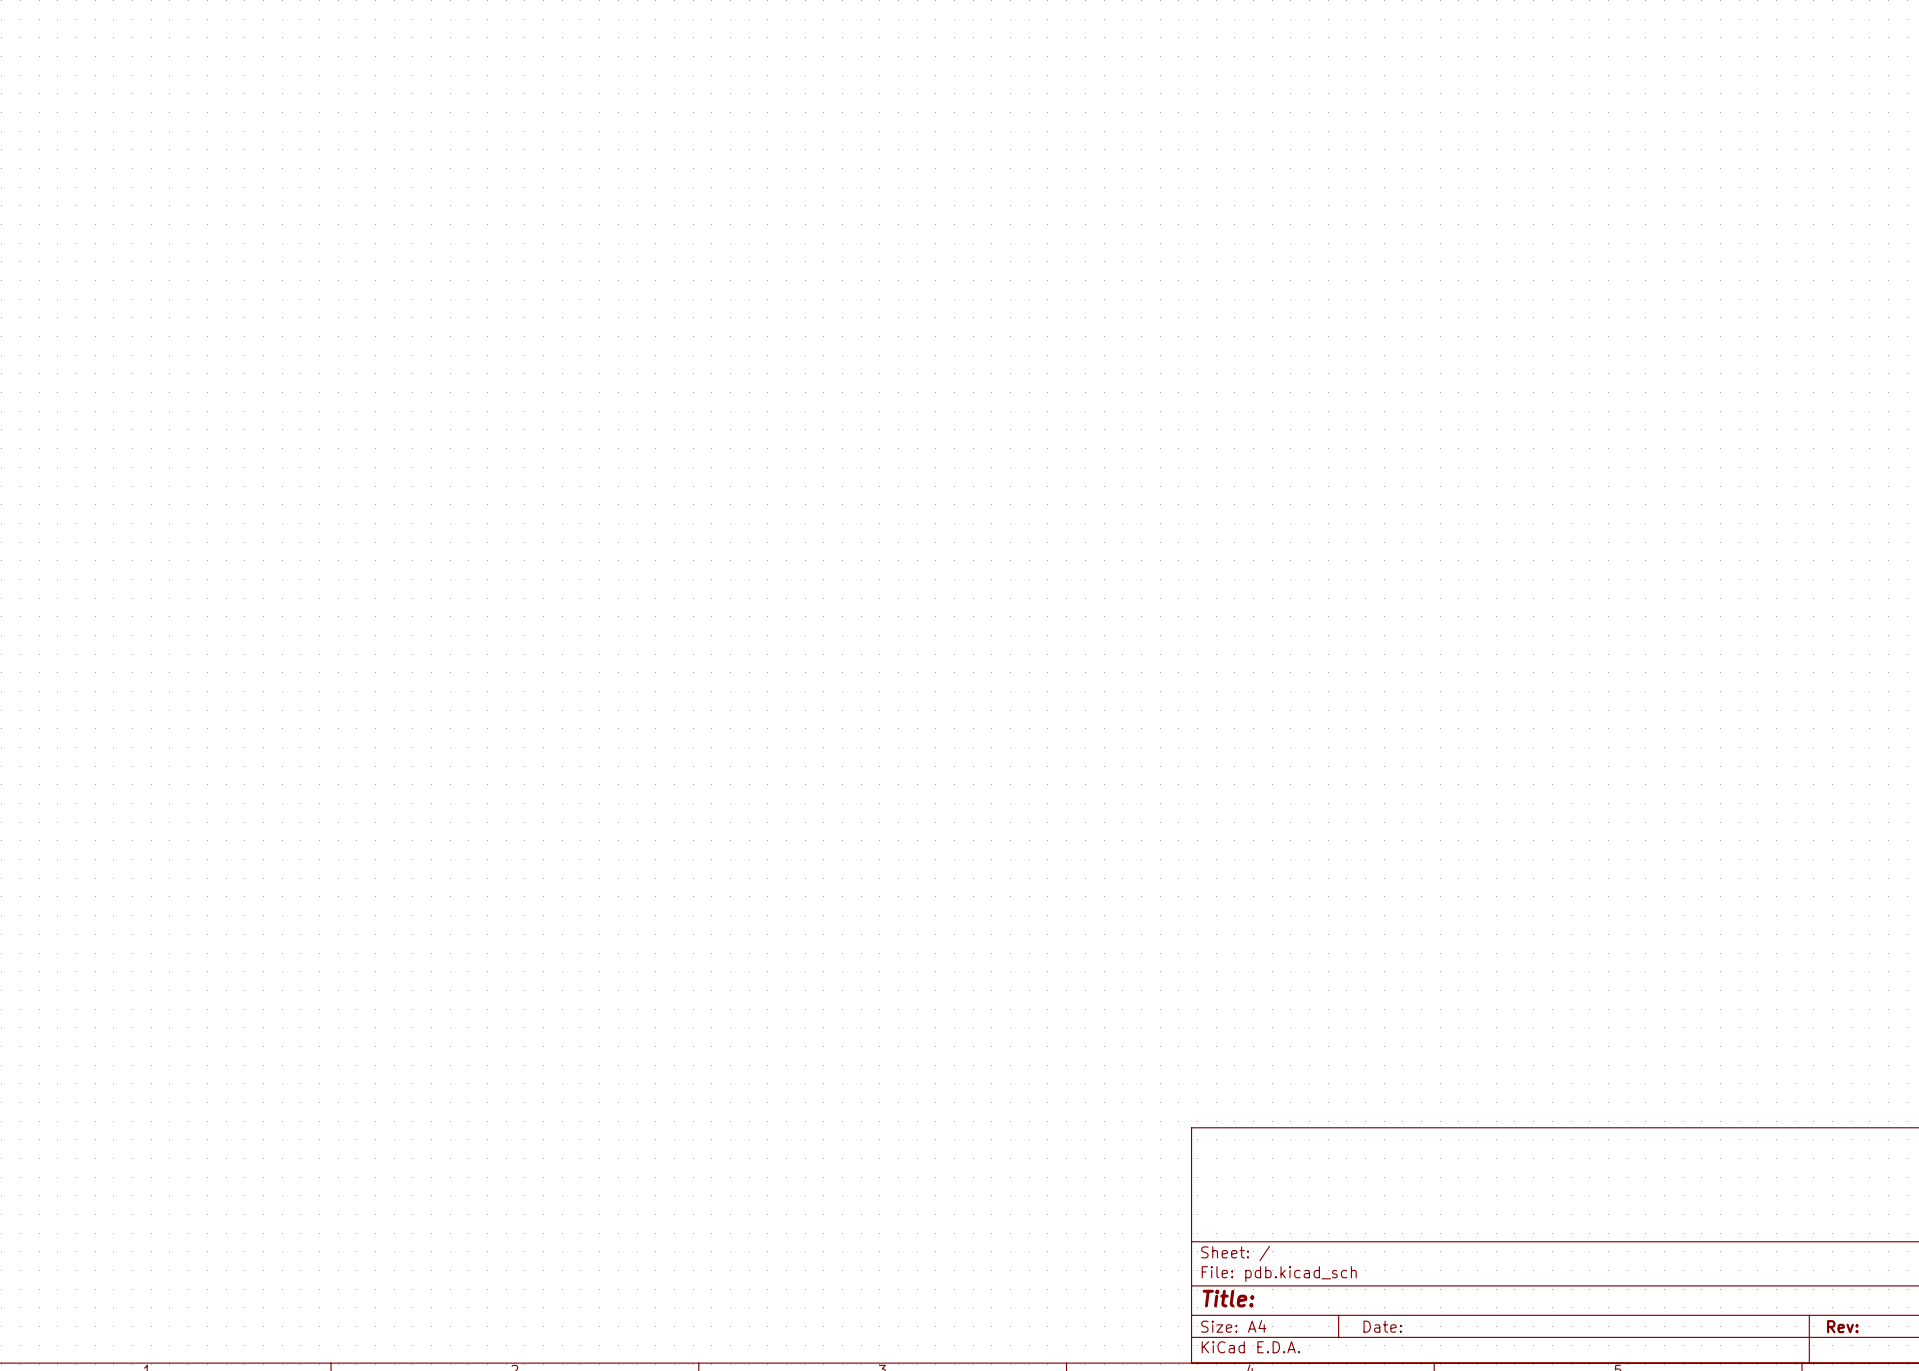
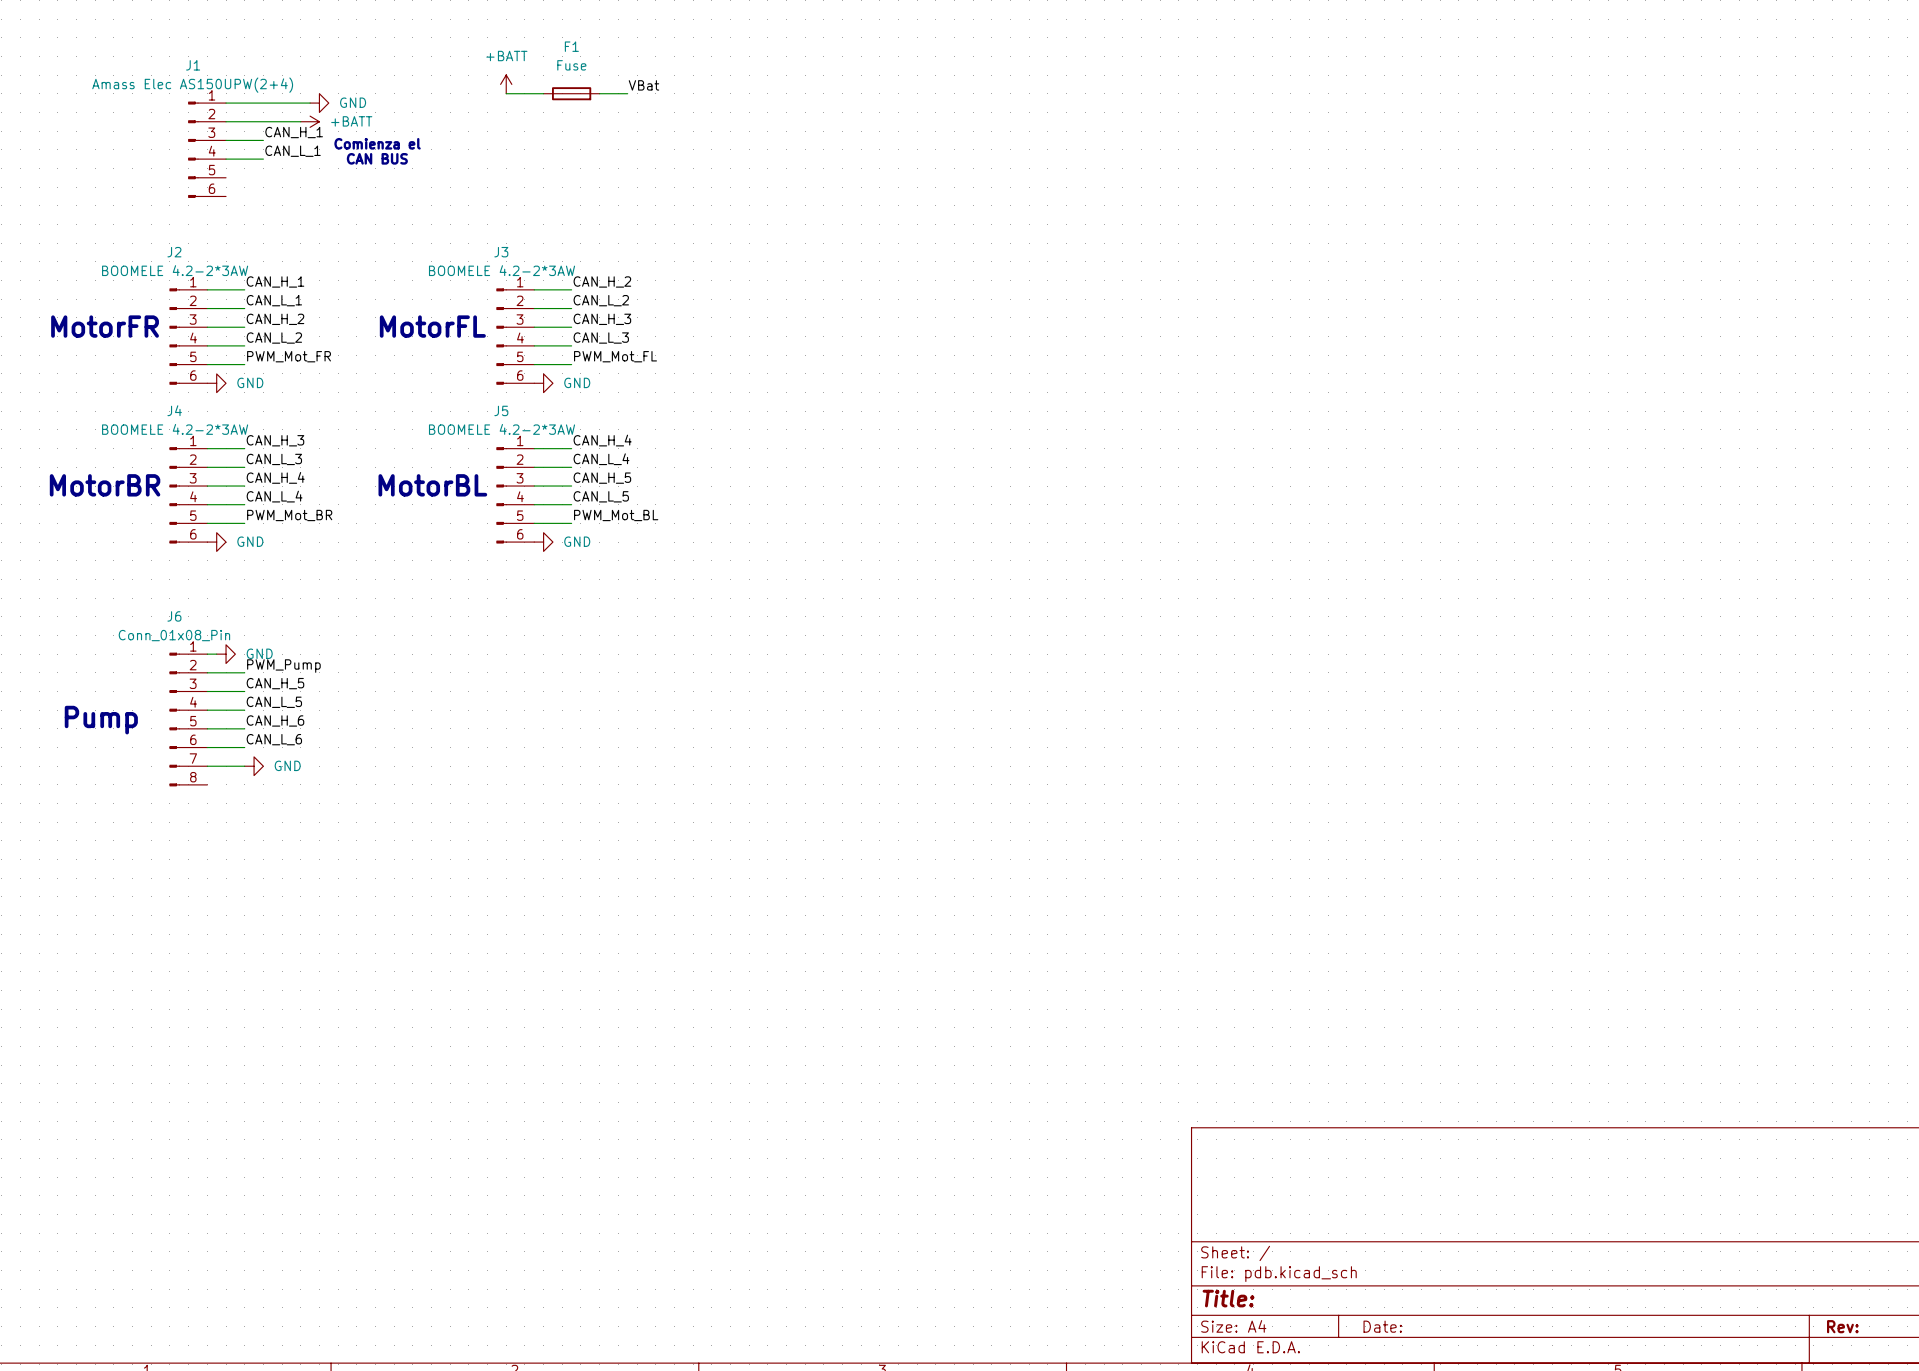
power symbol: none -> +BATT (506, 84)
label: none -> VBat (643, 85)
wire: none -> (506, 93) (543, 93)
F1: none -> Fuse (571, 93)
wire: none -> (599, 93) (627, 93)
wire: none -> (226, 103) (310, 103)
power symbol: none -> GND (319, 103)
wire: none -> (226, 121) (300, 121)
power symbol: none -> +BATT (310, 121)
label: none -> CAN_H_1 (294, 132)
wire: none -> (226, 140) (263, 140)
text: none -> Comienza el (377, 143)
J1: none -> Amass Elec AS150UPW(2+4) (207, 149)
label: none -> CAN_L_1 (293, 151)
text: none -> CAN BUS (377, 158)
wire: none -> (226, 159) (263, 159)
label: none -> CAN_H_1 (275, 281)
label: none -> CAN_H_2 (602, 281)
wire: none -> (207, 289) (244, 289)
wire: none -> (534, 289) (571, 289)
label: none -> CAN_L_1 (274, 300)
label: none -> CAN_L_2 (601, 300)
wire: none -> (207, 308) (244, 308)
wire: none -> (534, 308) (571, 308)
label: none -> CAN_H_2 (275, 319)
label: none -> CAN_H_3 (602, 319)
text: none -> MotorFR (105, 326)
text: none -> MotorFL (432, 326)
wire: none -> (207, 327) (244, 327)
wire: none -> (534, 327) (571, 327)
J2: none -> BOOMELE 4.2-2*3AW (188, 336)
J3: none -> BOOMELE 4.2-2*3AW (515, 336)
label: none -> CAN_L_2 (274, 338)
label: none -> CAN_L_3 (601, 338)
wire: none -> (207, 345) (244, 345)
wire: none -> (534, 345) (571, 345)
label: none -> PWM_Mot_FR (289, 356)
label: none -> PWM_Mot_FL (615, 356)
wire: none -> (207, 364) (244, 364)
wire: none -> (534, 364) (571, 364)
power symbol: none -> GND (216, 383)
power symbol: none -> GND (543, 383)
label: none -> CAN_H_3 (275, 440)
label: none -> CAN_H_4 (602, 440)
wire: none -> (207, 448) (244, 448)
wire: none -> (534, 448) (571, 448)
label: none -> CAN_L_3 (274, 459)
label: none -> CAN_L_4 (601, 459)
wire: none -> (207, 467) (244, 467)
wire: none -> (534, 467) (571, 467)
label: none -> CAN_H_4 (275, 477)
label: none -> CAN_H_5 (602, 478)
text: none -> MotorBR (105, 485)
text: none -> MotorBL (432, 485)
wire: none -> (207, 486) (244, 486)
wire: none -> (534, 486) (571, 486)
J4: none -> BOOMELE 4.2-2*3AW (188, 495)
J5: none -> BOOMELE 4.2-2*3AW (515, 495)
label: none -> CAN_L_4 (274, 496)
label: none -> CAN_L_5 (601, 496)
wire: none -> (207, 504) (244, 504)
wire: none -> (534, 504) (571, 504)
label: none -> PWM_Mot_BR (289, 515)
label: none -> PWM_Mot_BL (616, 515)
wire: none -> (207, 523) (244, 523)
wire: none -> (534, 523) (571, 523)
power symbol: none -> GND (216, 542)
power symbol: none -> GND (543, 542)
wire: none -> (207, 654) (216, 654)
power symbol: none -> GND (226, 654)
label: none -> PWM_Pump (283, 666)
wire: none -> (207, 672) (244, 672)
label: none -> CAN_H_5 (275, 683)
wire: none -> (207, 691) (244, 691)
label: none -> CAN_L_5 (274, 702)
wire: none -> (207, 710) (244, 710)
J6: none -> Conn_01x08_Pin (188, 719)
text: none -> Pump (101, 720)
label: none -> CAN_H_6 (275, 720)
wire: none -> (207, 728) (244, 728)
label: none -> CAN_L_6 (274, 739)
wire: none -> (207, 747) (244, 747)
wire: none -> (207, 766) (244, 766)
power symbol: none -> GND (254, 766)

